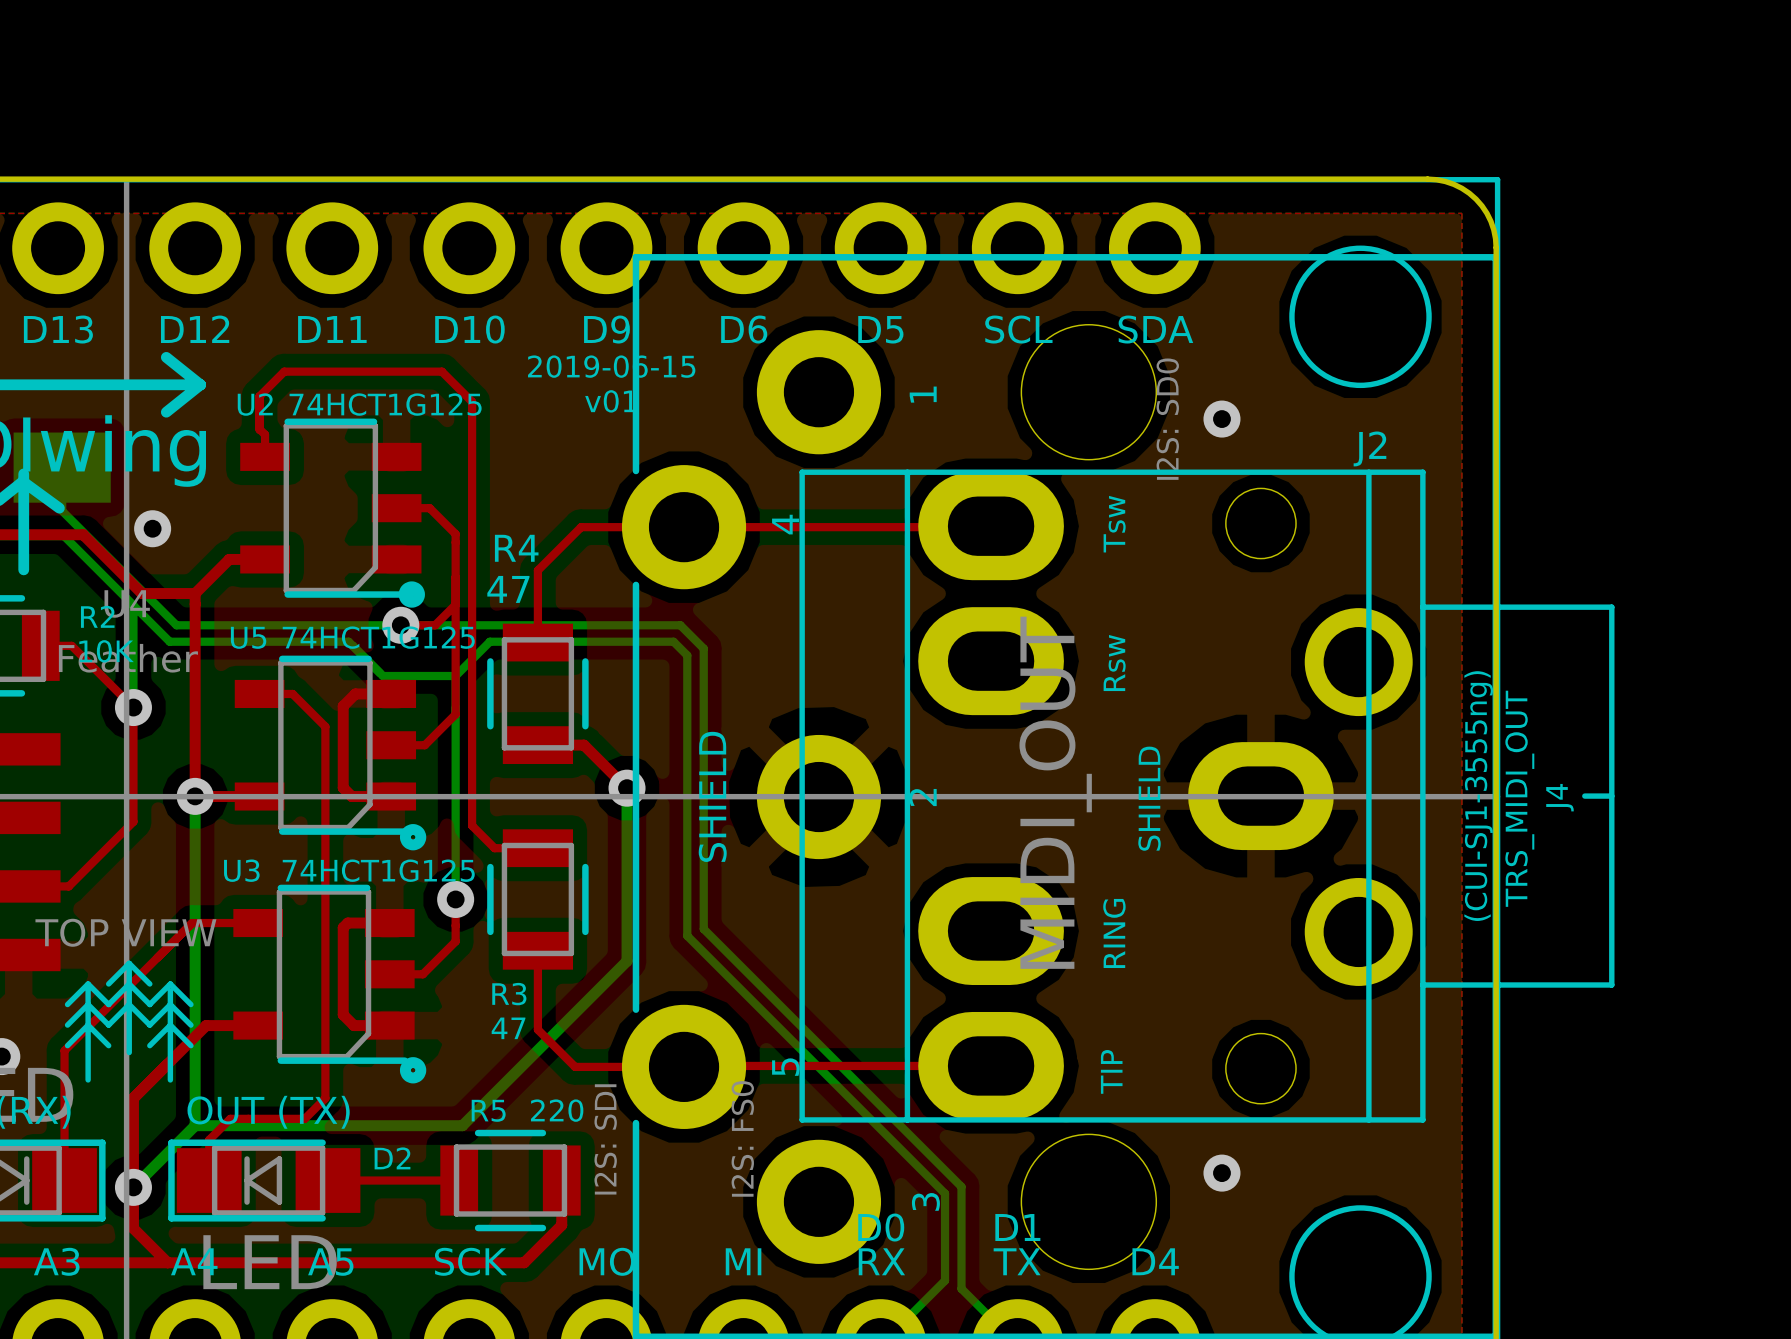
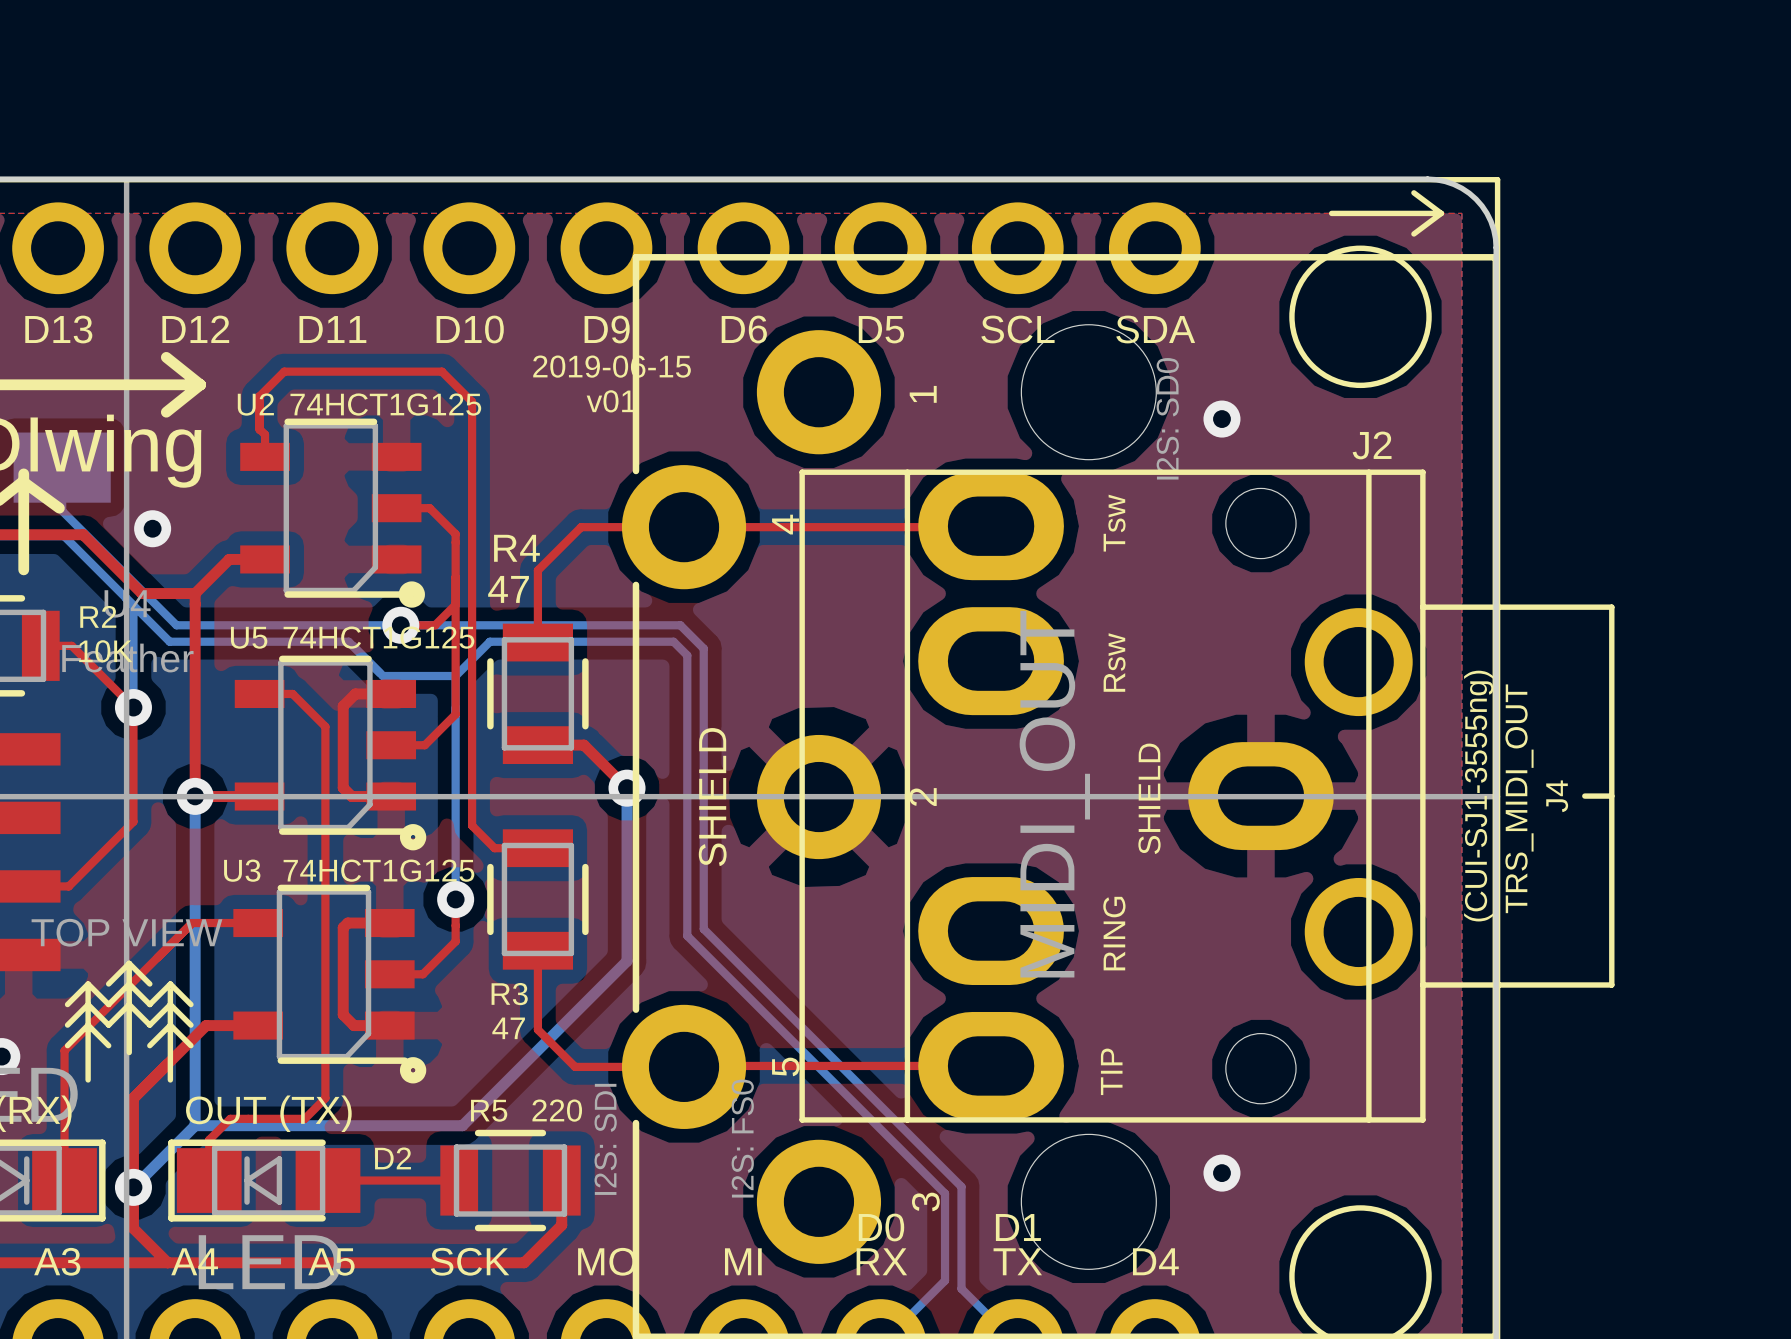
line: none -> (1413, 192) (1441, 213)
line: none -> (1331, 213) (1441, 213)
line: none -> (1441, 213) (1413, 233)

